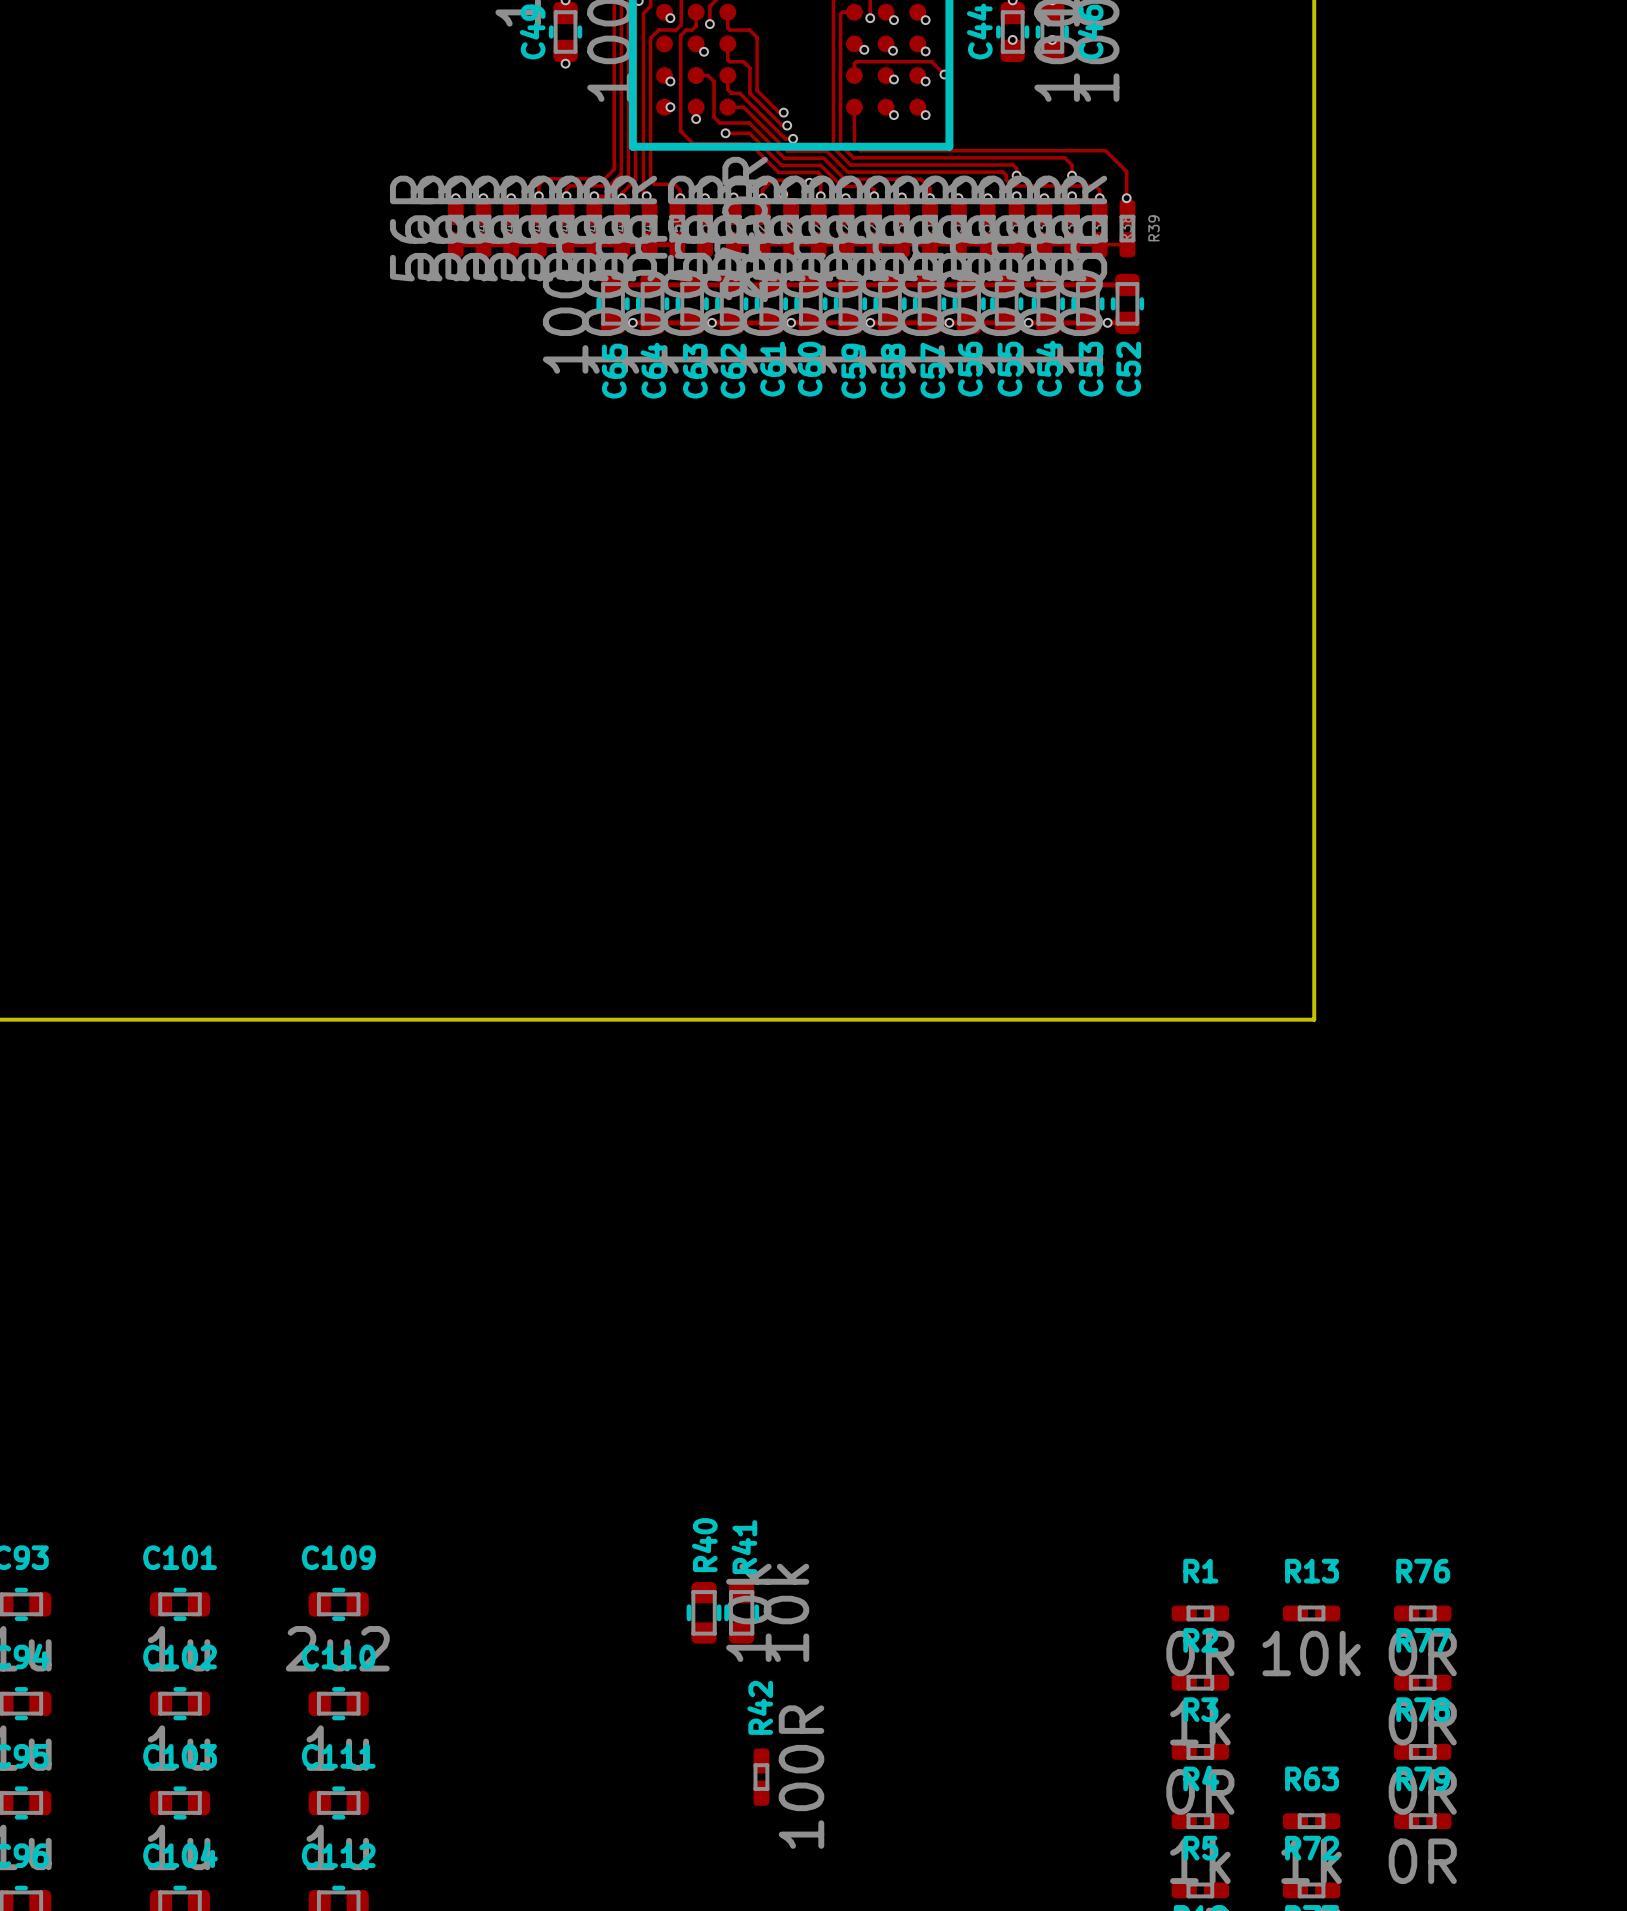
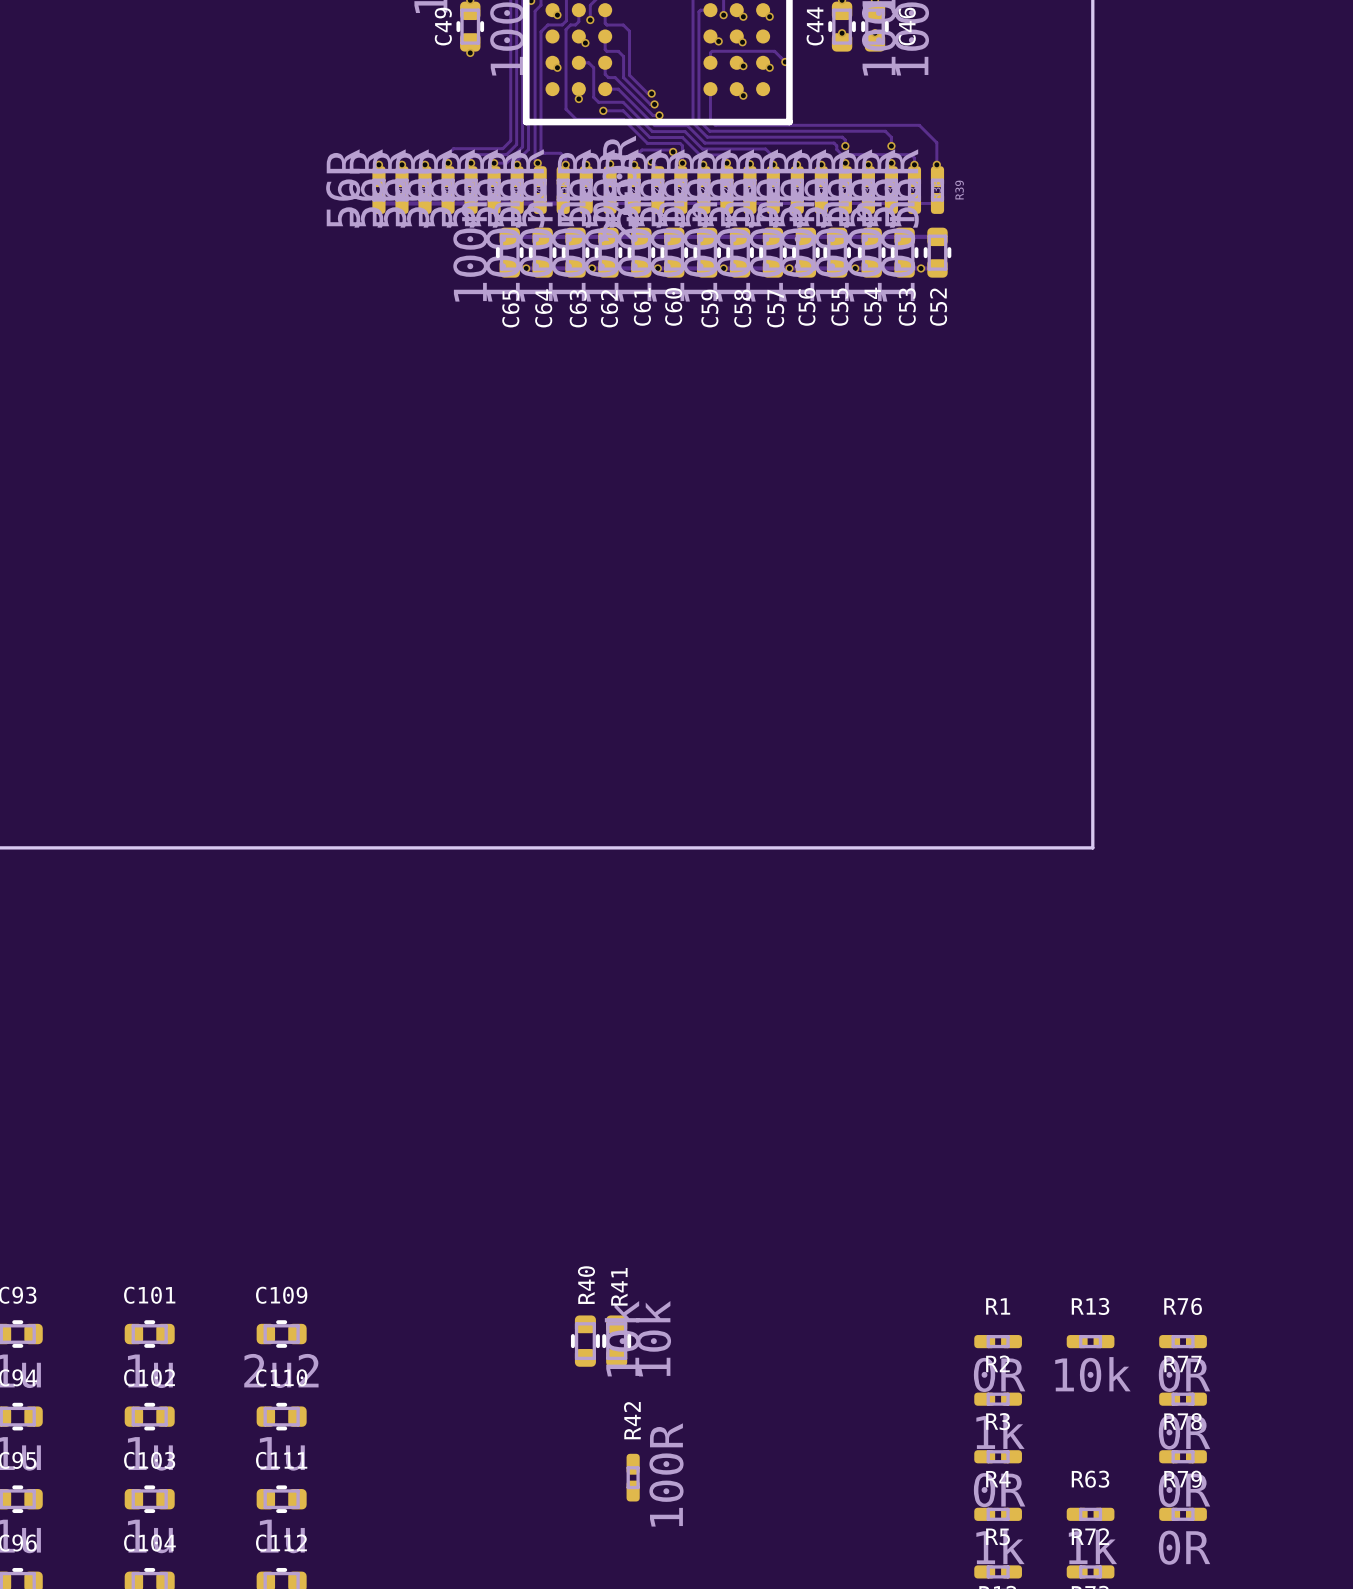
via: (925, 51) -> none
via: (670, 107) -> none
via: (925, 115) -> none

